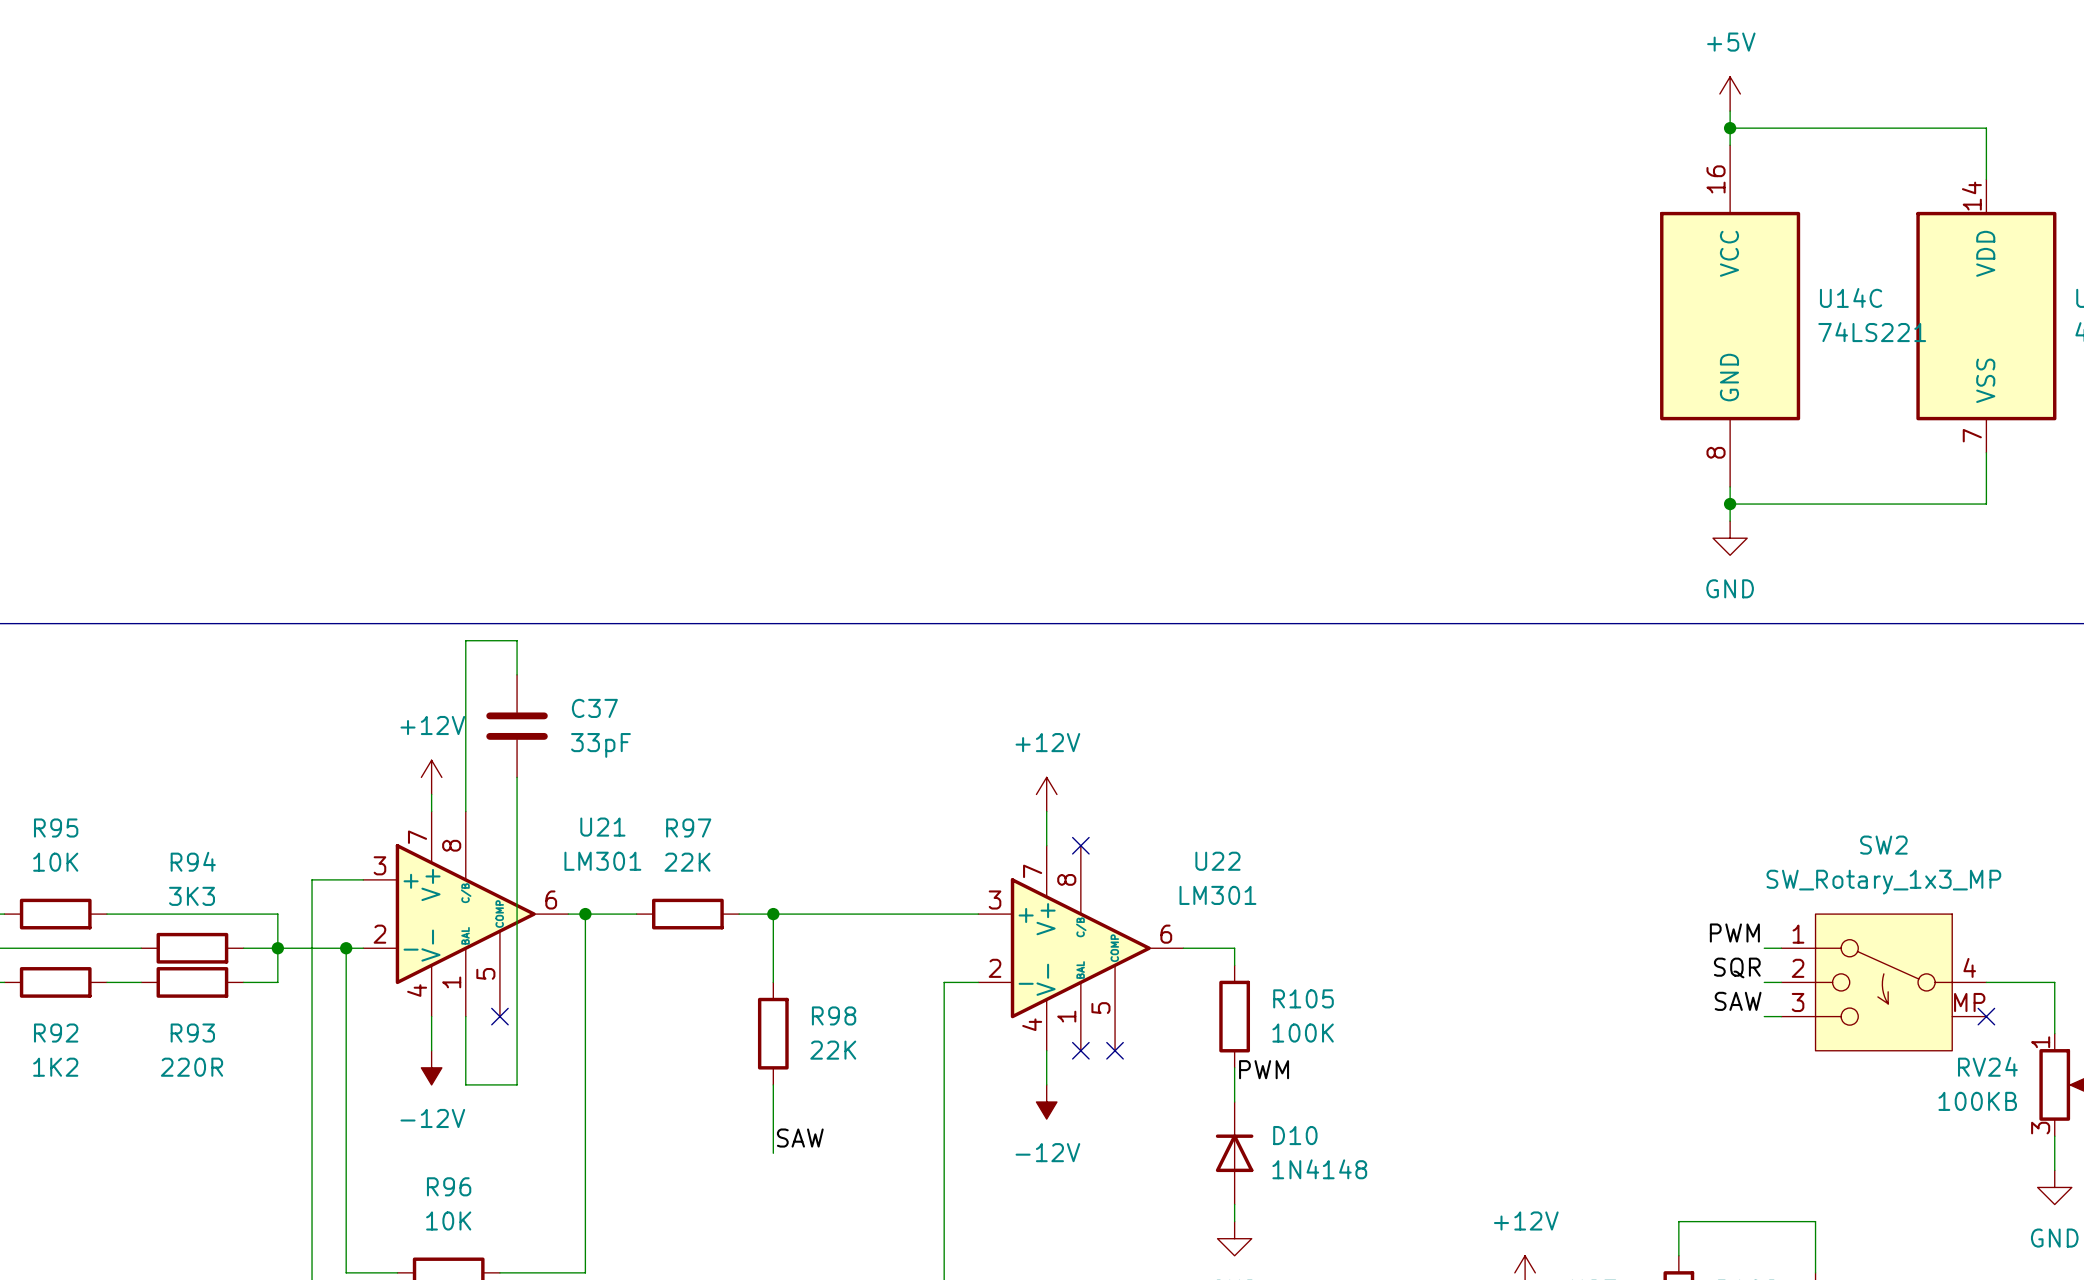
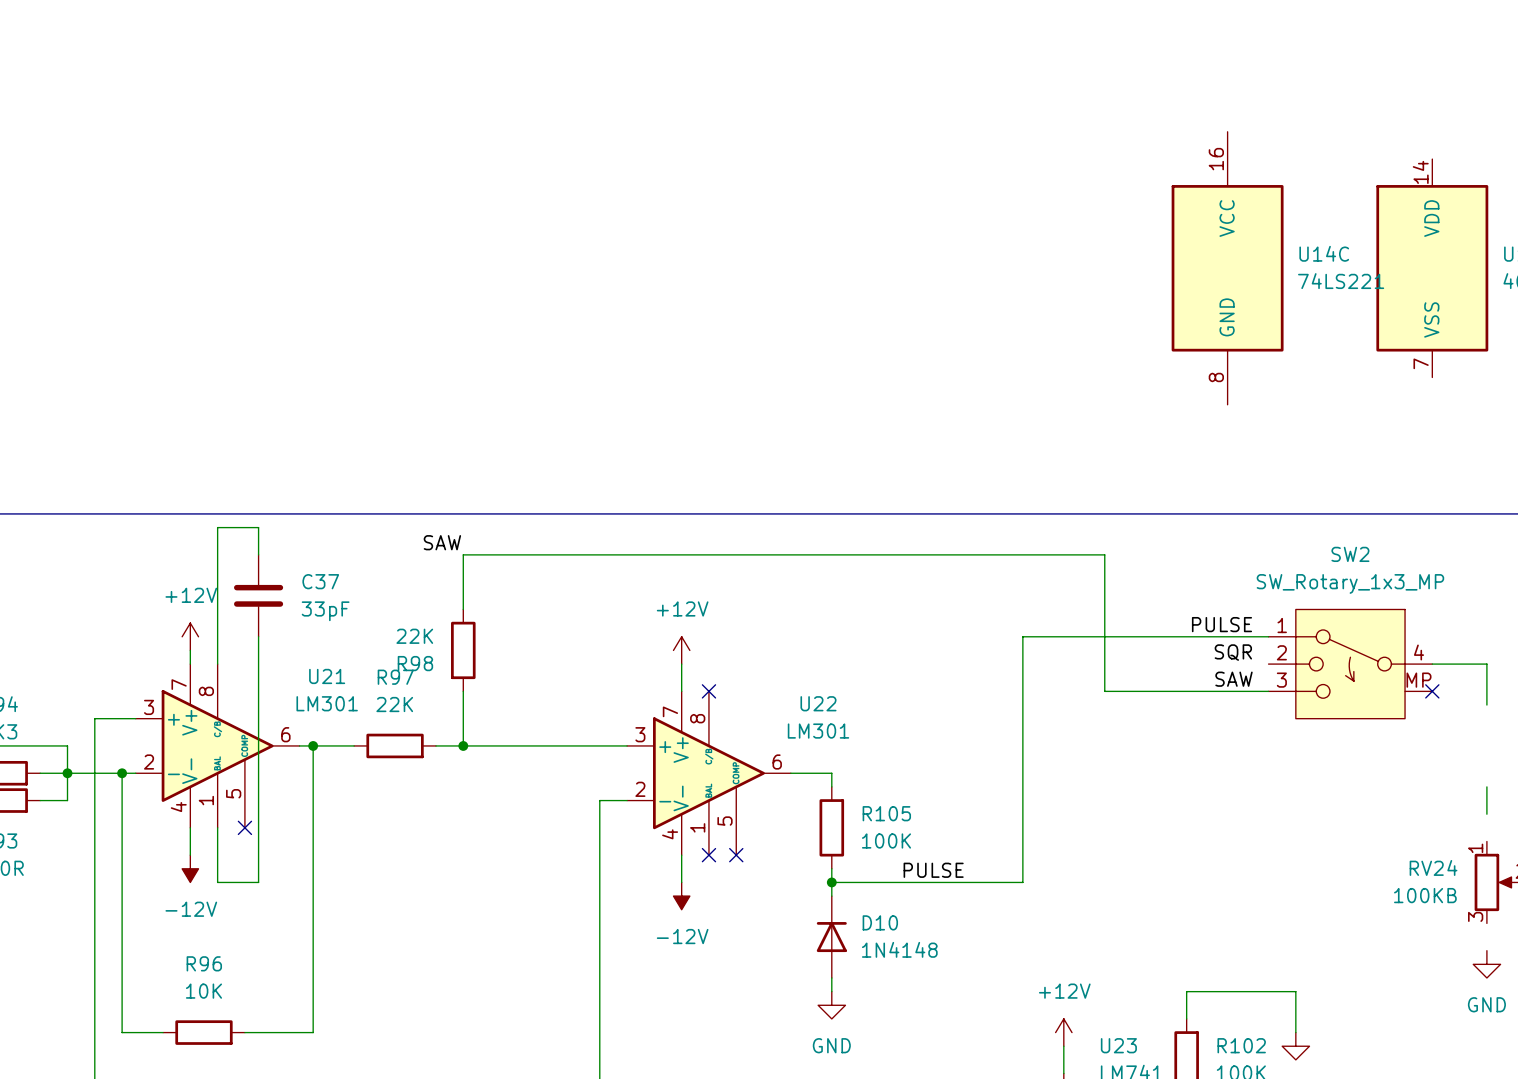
power symbol: +5V (1730, 93) -> none
wire: (1730, 111) (1730, 145) -> none
wire: (1730, 128) (1986, 128) (1986, 179) -> none
junction: (1730, 128) -> none
wire: (1986, 452) (1986, 504) (1730, 504) -> none
wire: (1730, 486) (1730, 521) -> none
junction: (1730, 504) -> none
power symbol: GND (1730, 538) -> none
label: none -> SAW (442, 542)
wire: none -> (463, 609) (463, 554) (1104, 554) (1104, 691) (1268, 691)
label: none -> PULSE (1221, 624)
wire: none -> (1268, 636) (1022, 636) (1022, 882) (831, 882)
wire: none -> (1432, 664) (1486, 664) (1486, 705)
no-connect mark: none -> (1432, 691)
wire: (773, 914) (773, 982) -> (463, 745) (463, 691)
label: PWM (1734, 933) -> none
wire: (1764, 948) (1781, 948) -> none
label position: SQR (1737, 967) -> SQR (1233, 652)
wire: (1764, 982) (1781, 982) -> none
SW2 position: (1883, 982) -> (1350, 664)
wire: (1986, 982) (2054, 982) -> (1486, 786) (1486, 800)
wire: (2054, 999) (2054, 1033) -> none
label position: SAW (1738, 1001) -> SAW (1233, 679)
R98 name position: R98 (834, 1015) -> R98 (415, 663)
wire: (1764, 1016) (1781, 1016) -> none
no-connect mark: (1986, 1016) -> none
R98 position: (773, 1033) -> (463, 650)
R98 value position: 22K (833, 1050) -> 22K (414, 636)
label: PWM (1264, 1069) -> none
label: none -> PULSE (933, 870)
wire: (773, 1084) (773, 1153) -> none
junction: none -> (831, 882)
wire: (2054, 1136) (2054, 1170) -> none
label: SAW (800, 1138) -> none

